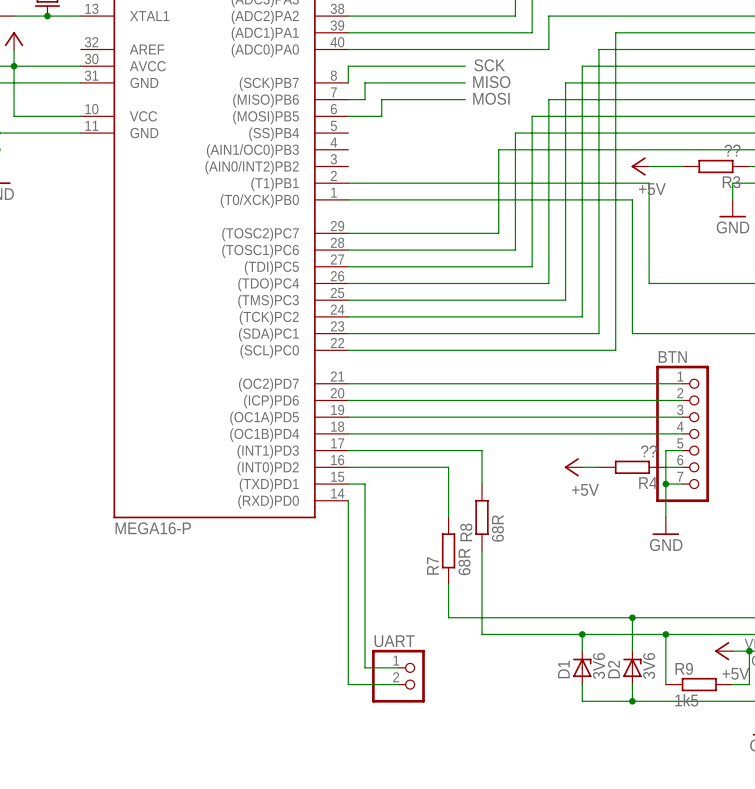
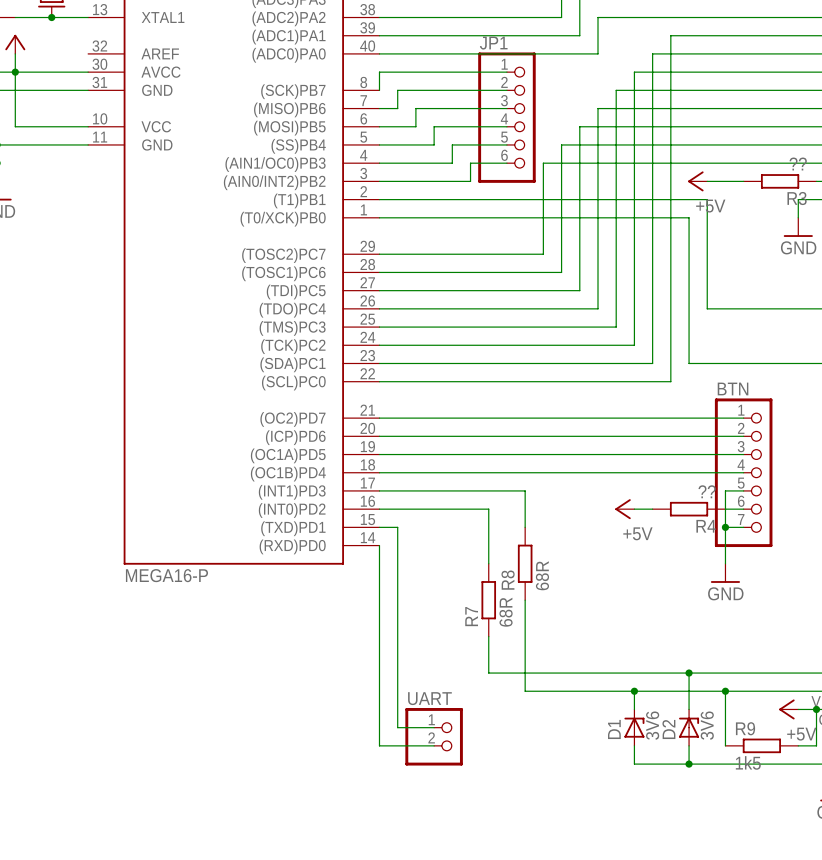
label: SCK (489, 65) -> none
label: MISO (491, 82) -> none
label: MOSI (491, 98) -> none
JP1: none -> (506, 117)
wire: none -> (506, 126) (434, 126) (434, 144) (379, 144)
wire: none -> (506, 144) (452, 144) (452, 163) (379, 163)
wire: none -> (506, 163) (470, 163) (470, 181) (379, 181)

